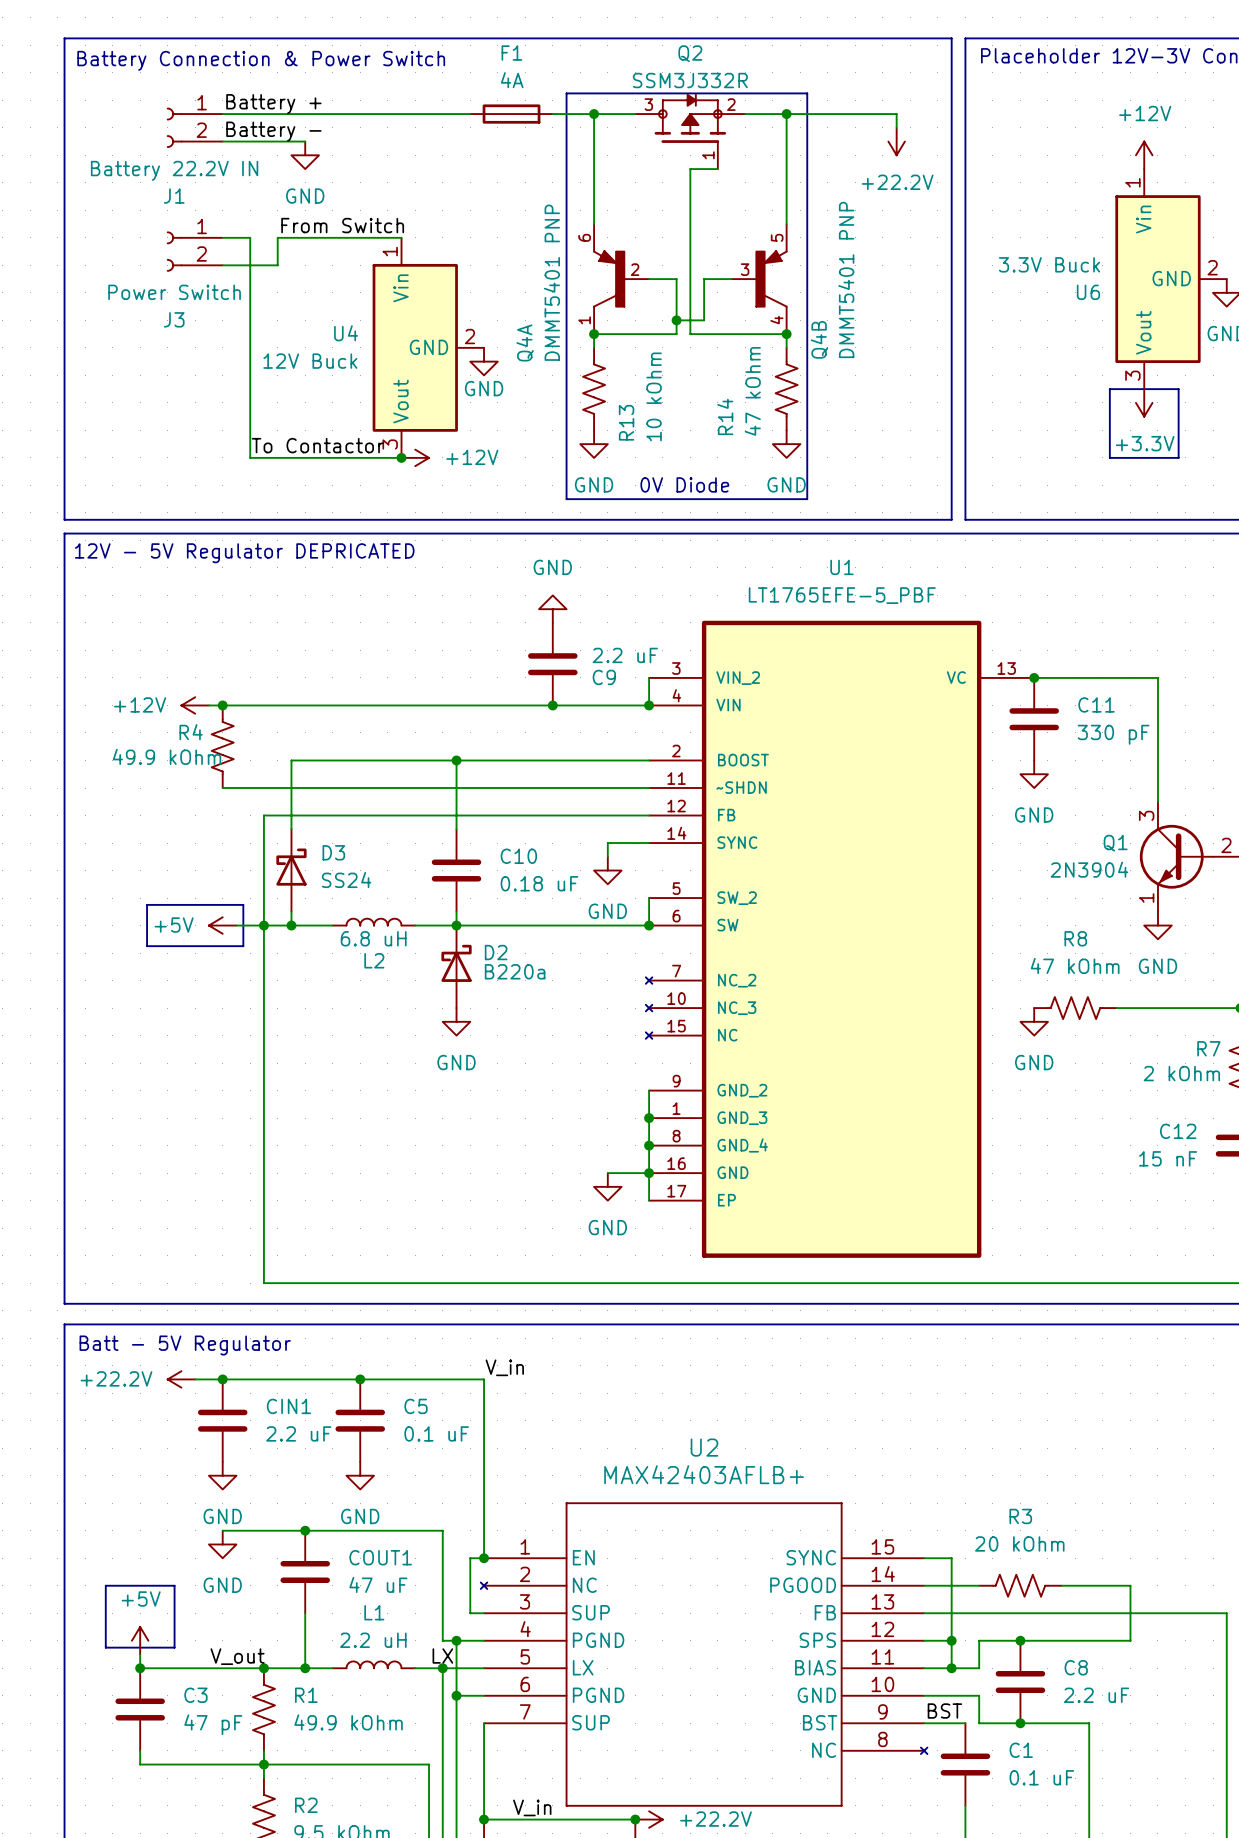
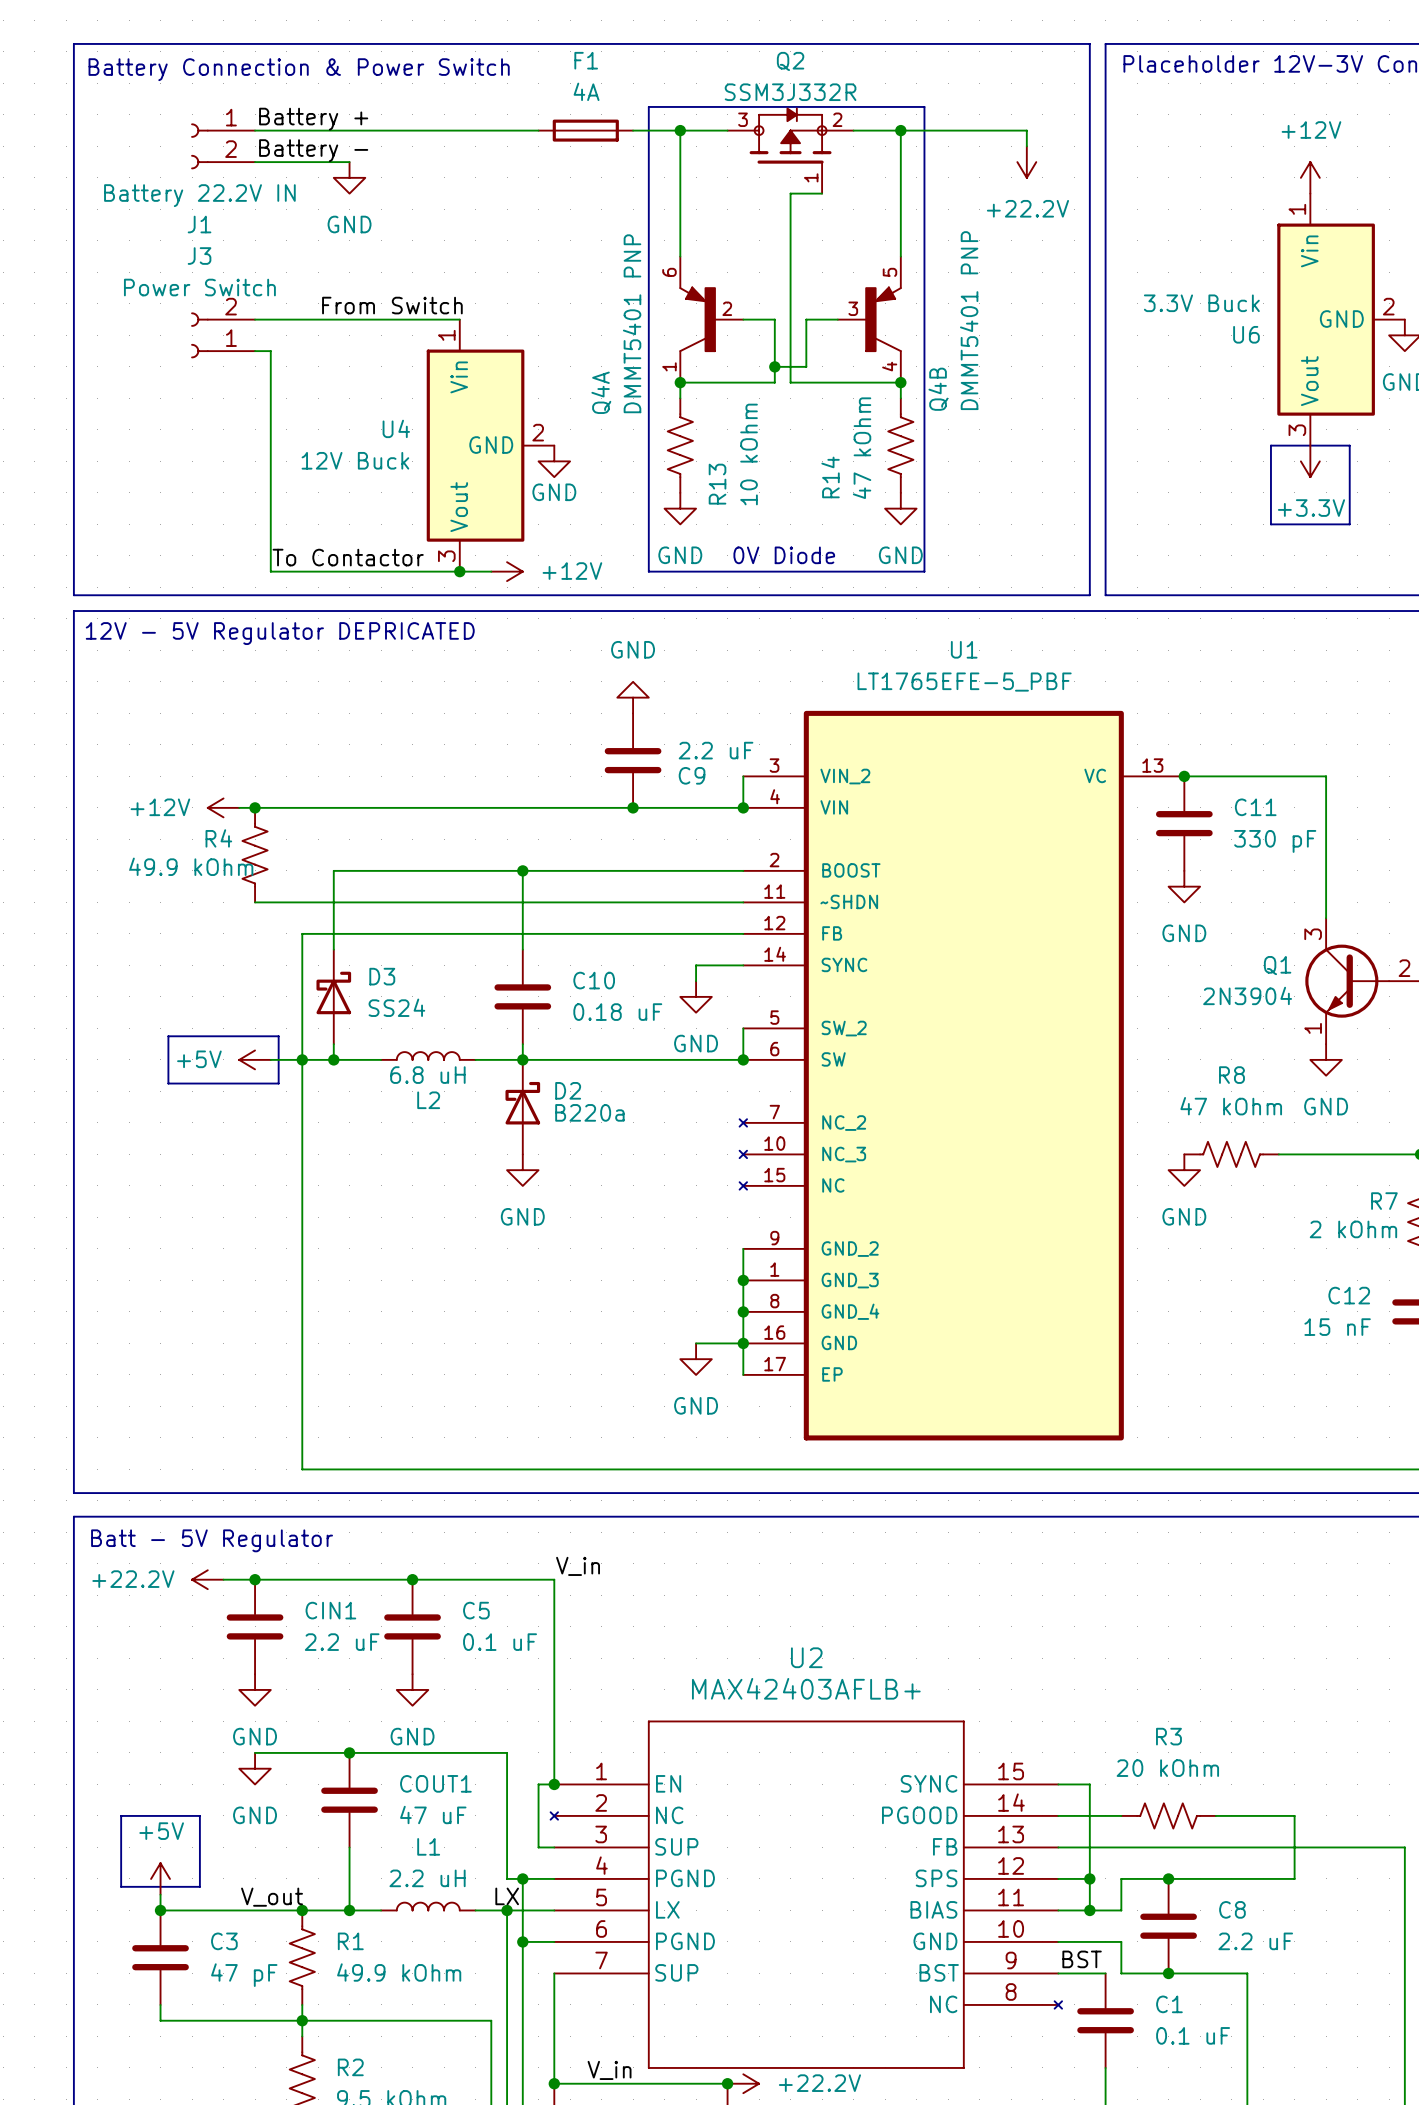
label position: From Switch (342, 225) -> From Switch (392, 305)
wire: (222, 237) (250, 237) (250, 457) (401, 457) -> none
wire: (401, 237) (277, 237) (277, 265) (222, 265) -> none
J3 flip: as is (174, 251) -> up-down (199, 335)
J3 position: (194, 251) -> (223, 335)
wire: none -> (255, 319) (459, 319)
wire: none -> (255, 351) (270, 351) (270, 571) (491, 571)
U4 position: (428, 347) -> (490, 445)
power symbol position: GND (484, 361) -> GND (554, 461)
label position: To Contactor (317, 445) -> To Contactor (348, 557)
junction position: (401, 457) -> (459, 571)
power symbol position: +12V (415, 457) -> +12V (507, 571)

